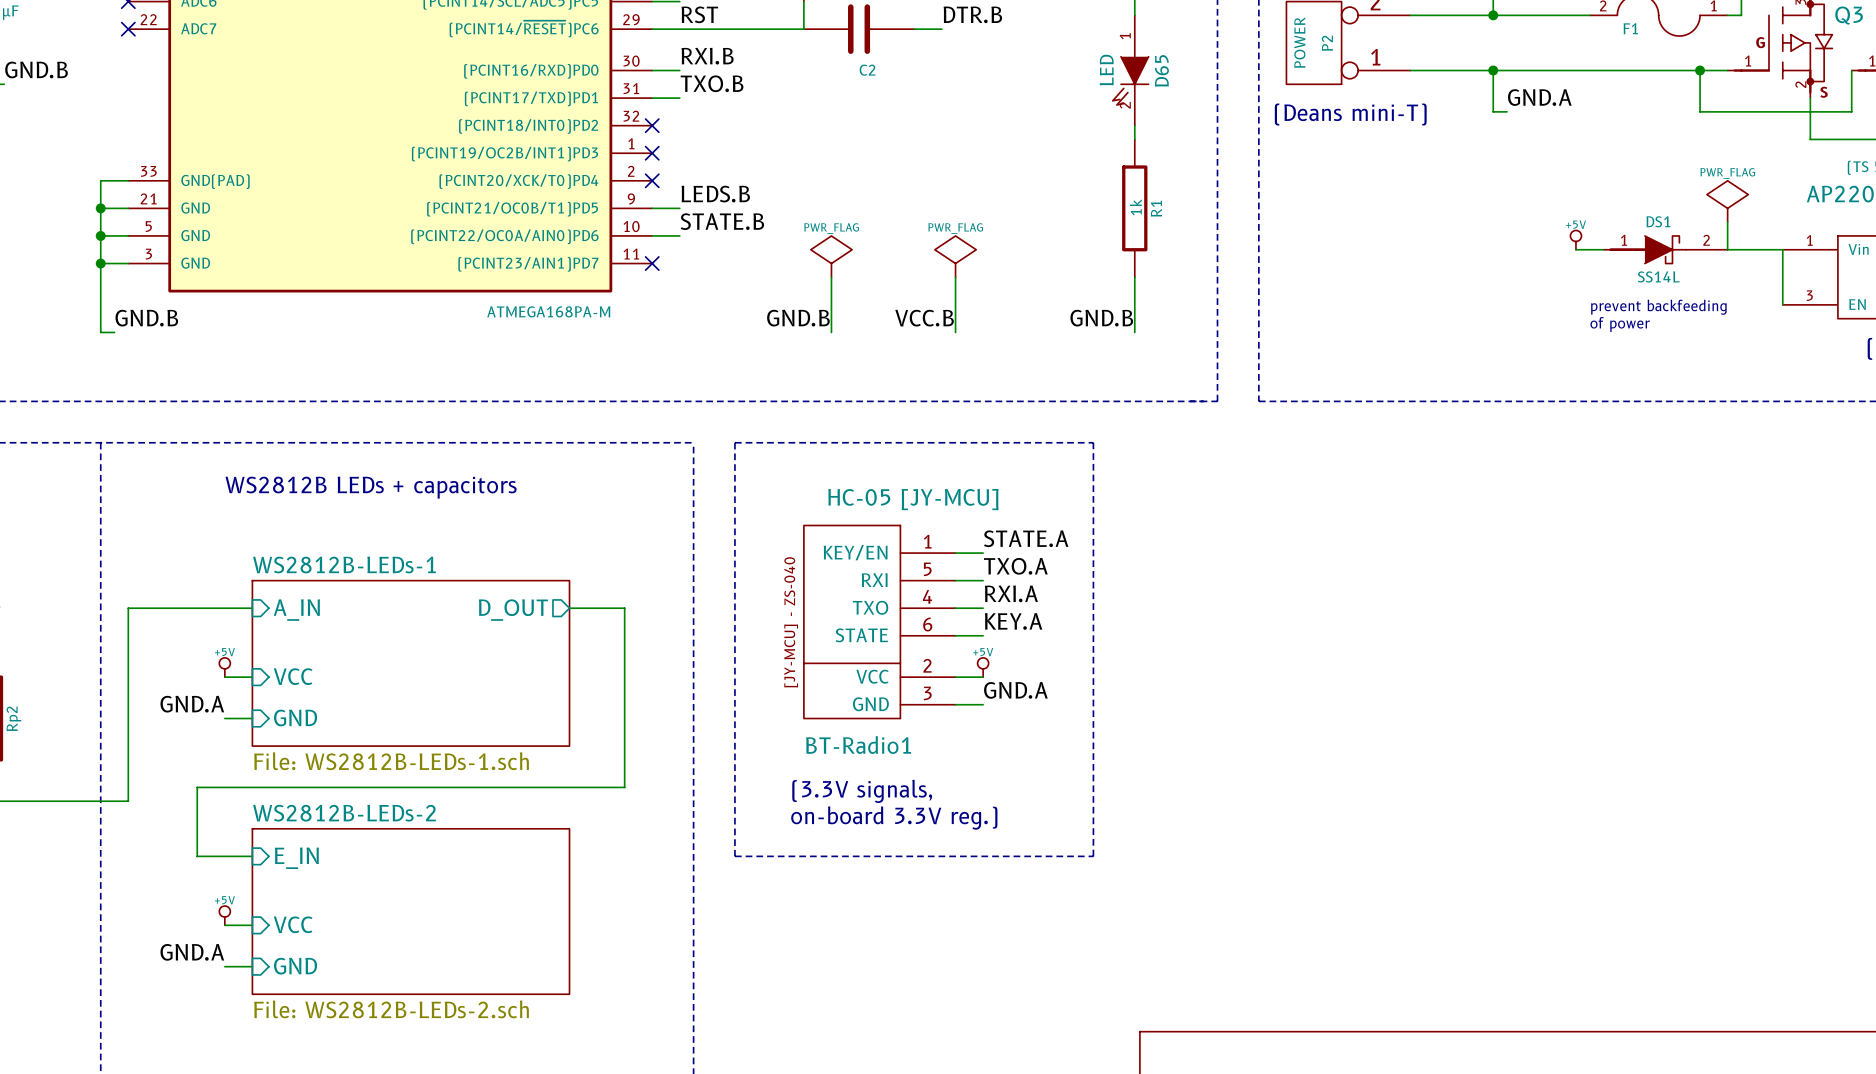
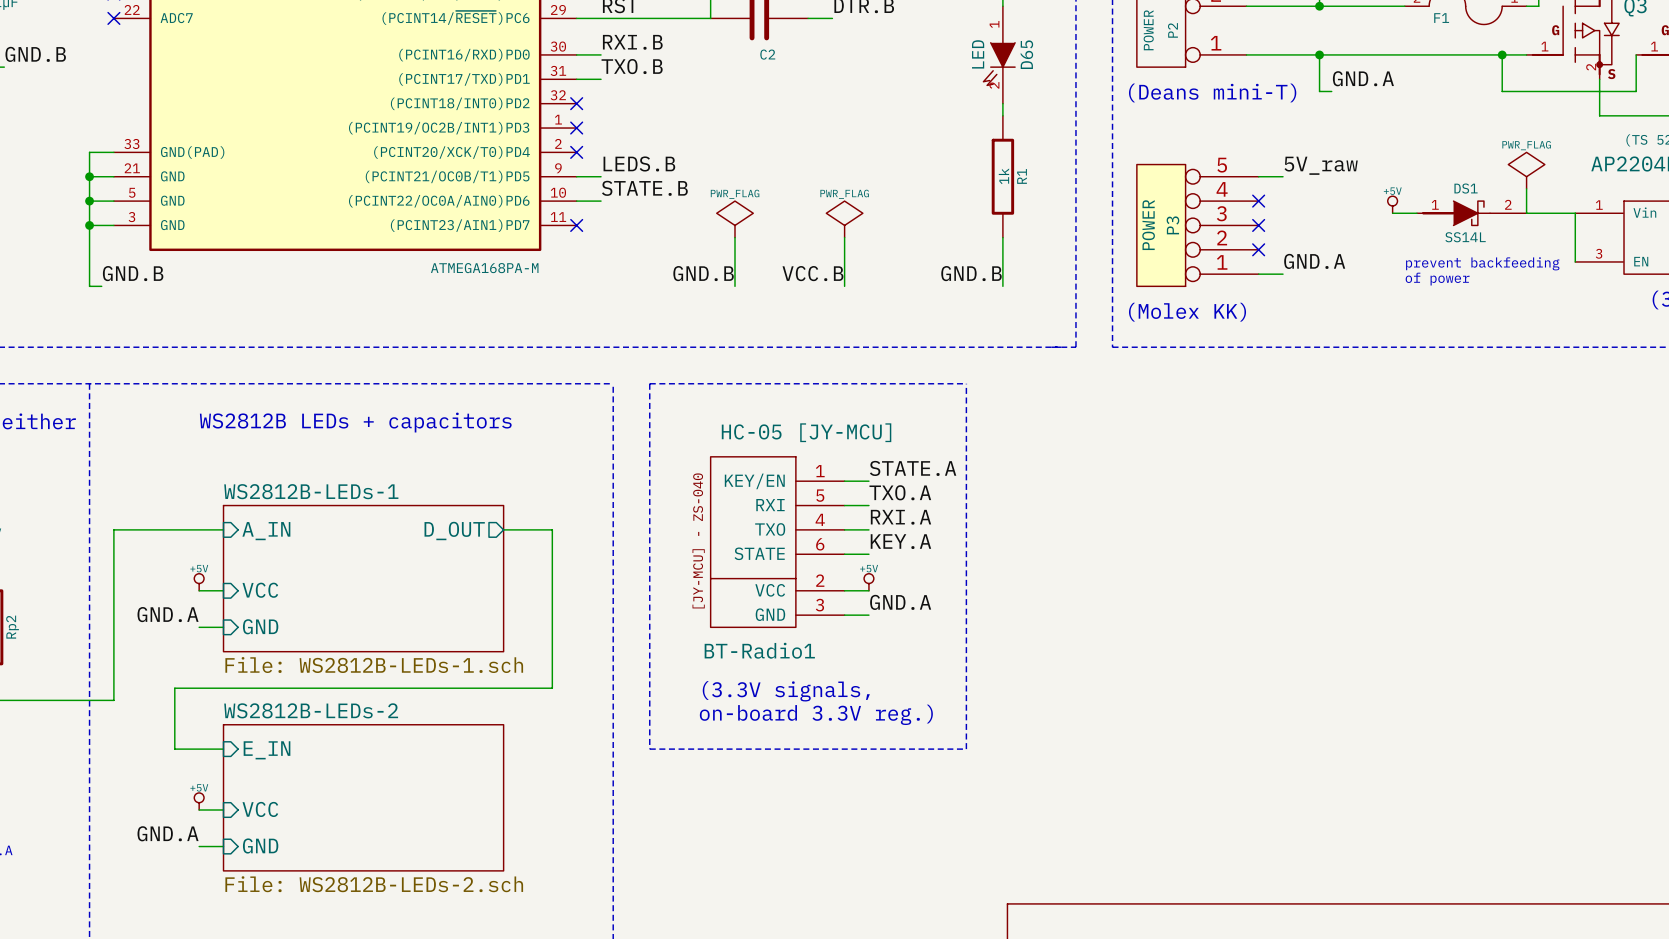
label: none -> 5V_raw (1321, 165)
wire: none -> (1258, 176) (1283, 176)
no-connect mark: none -> (1258, 201)
P3: none -> POWER (1197, 225)
no-connect mark: none -> (1258, 225)
no-connect mark: none -> (1258, 249)
label: none -> GND.A (1314, 261)
wire: none -> (1258, 274) (1283, 274)
text: none -> (Molex KK) (1187, 312)

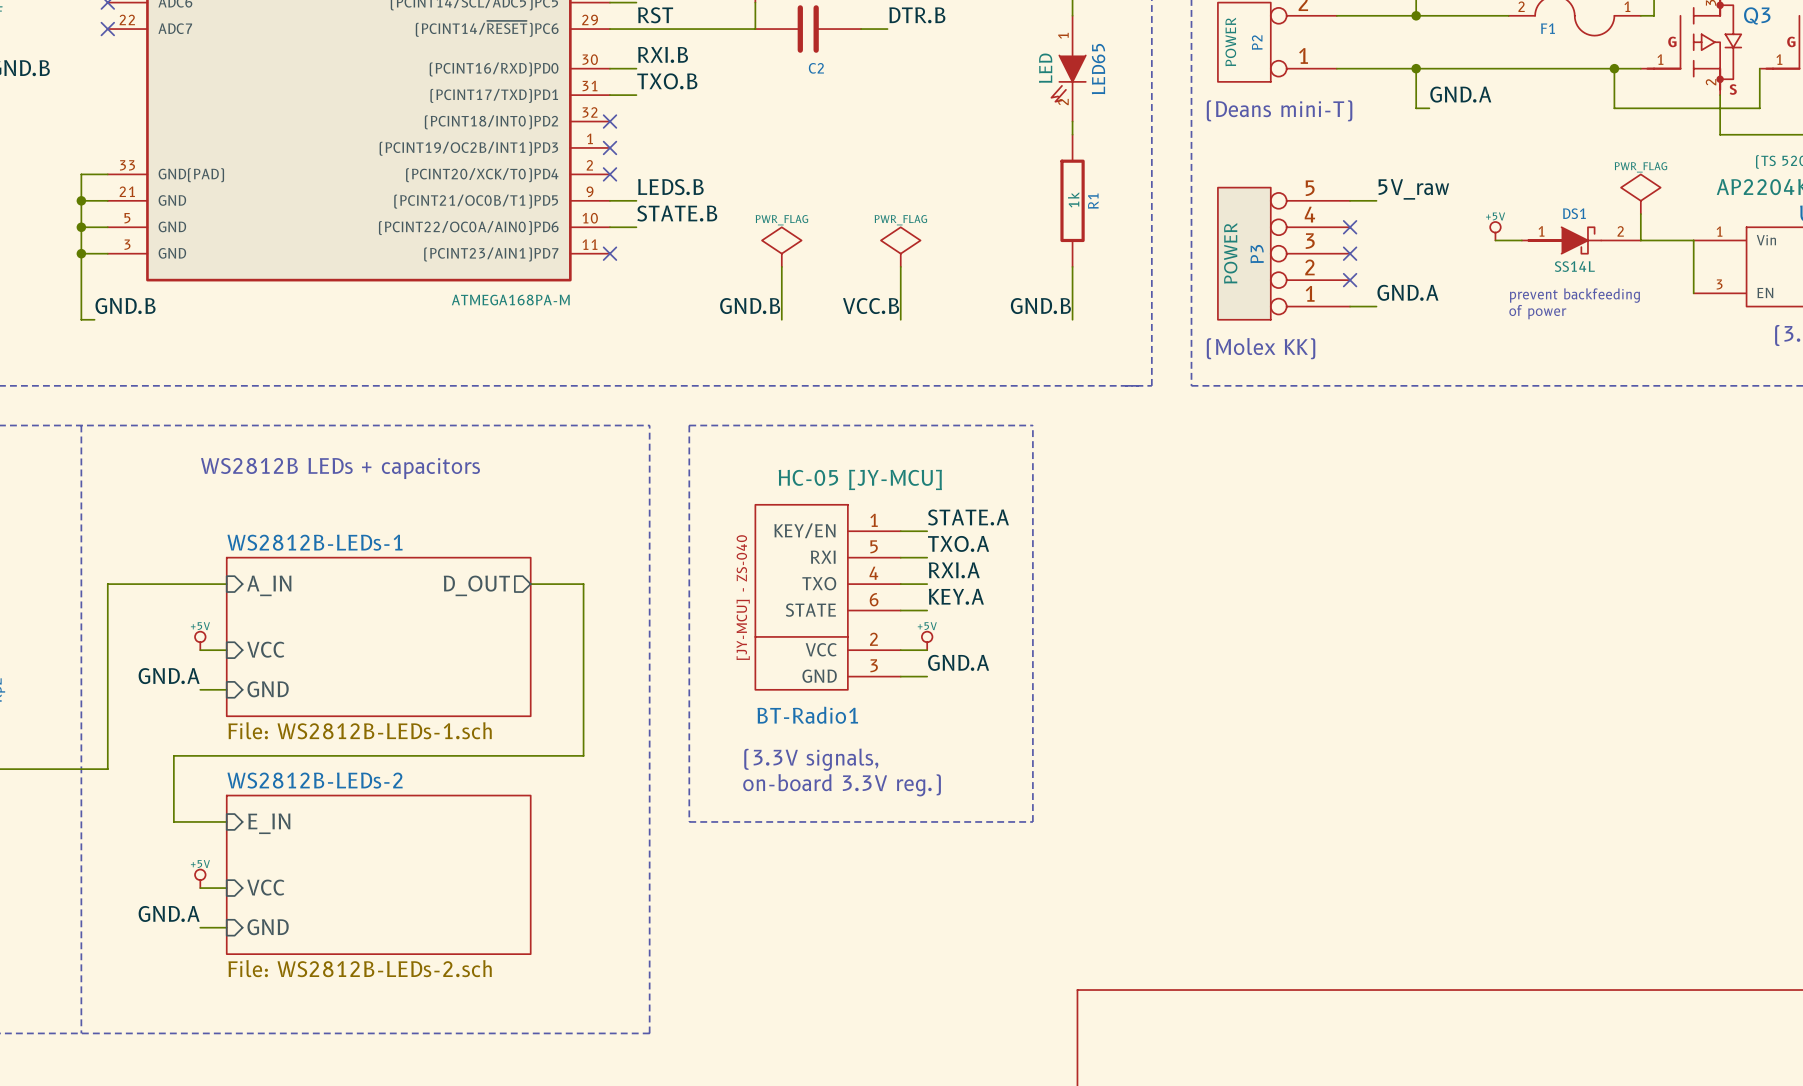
D65 name: D65 (1026, 54) -> LED65 (1098, 69)

